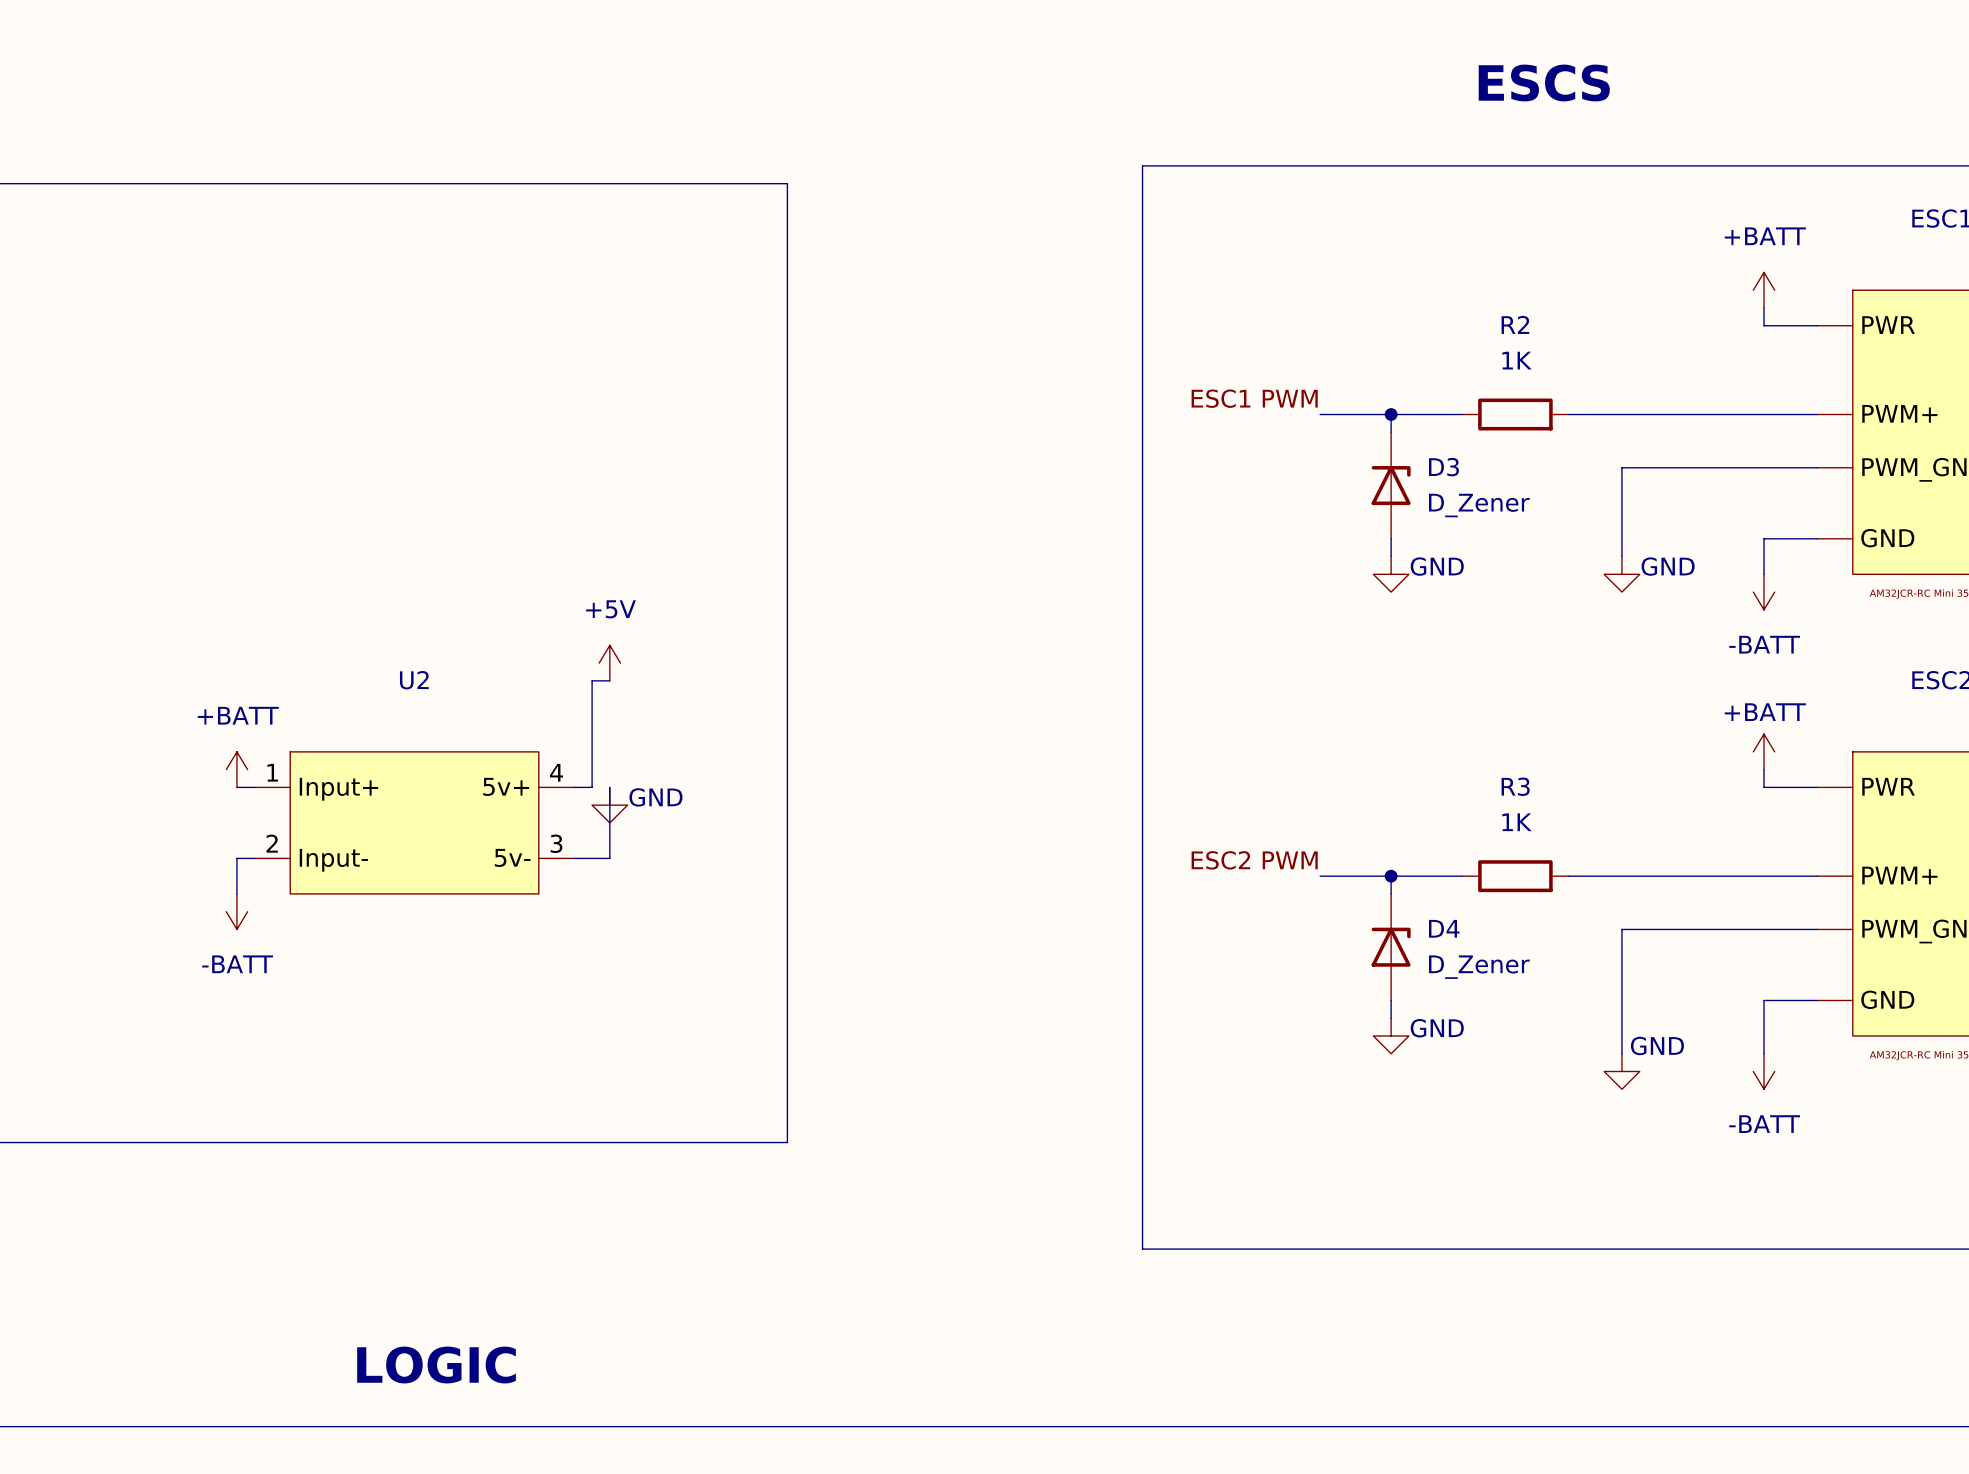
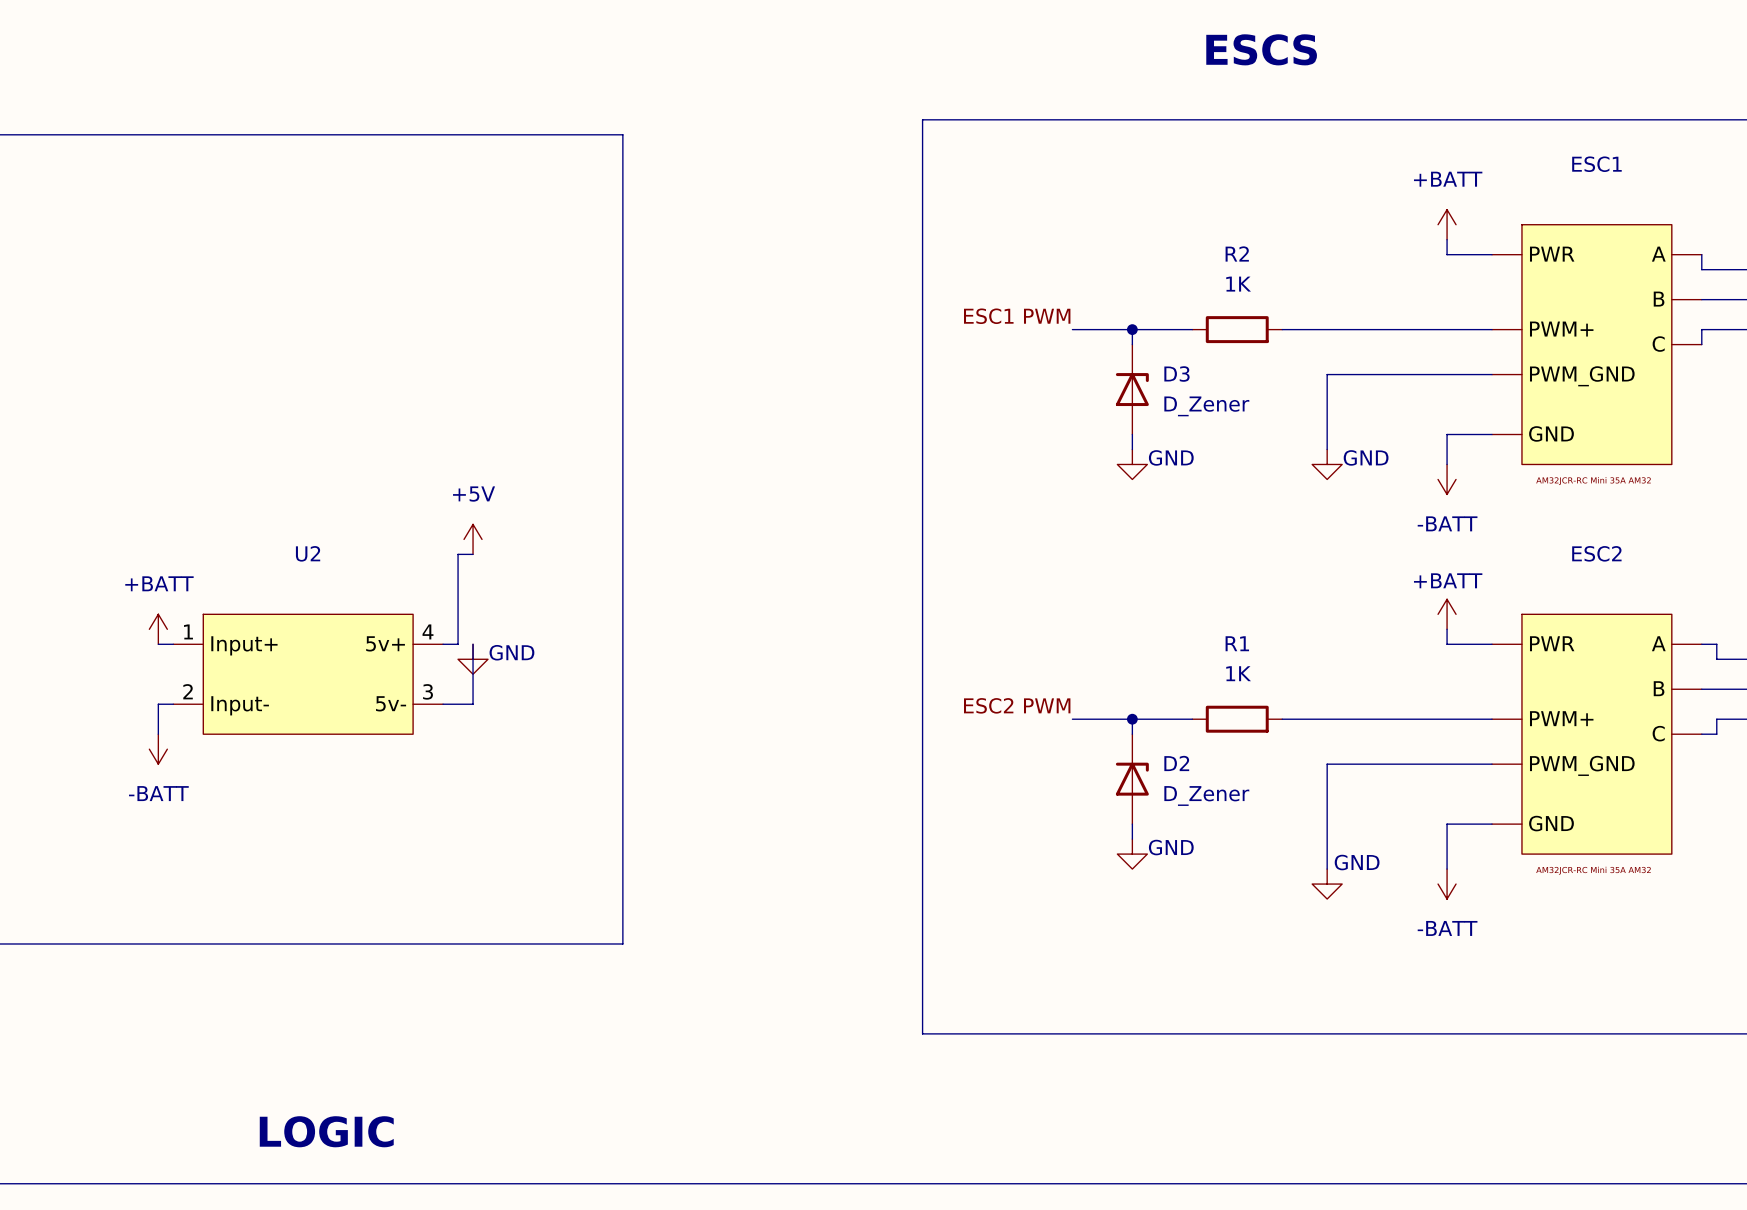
R3 name: R3 (1515, 786) -> R1 (1237, 643)
D4 name: D4 (1444, 928) -> D2 (1176, 763)

